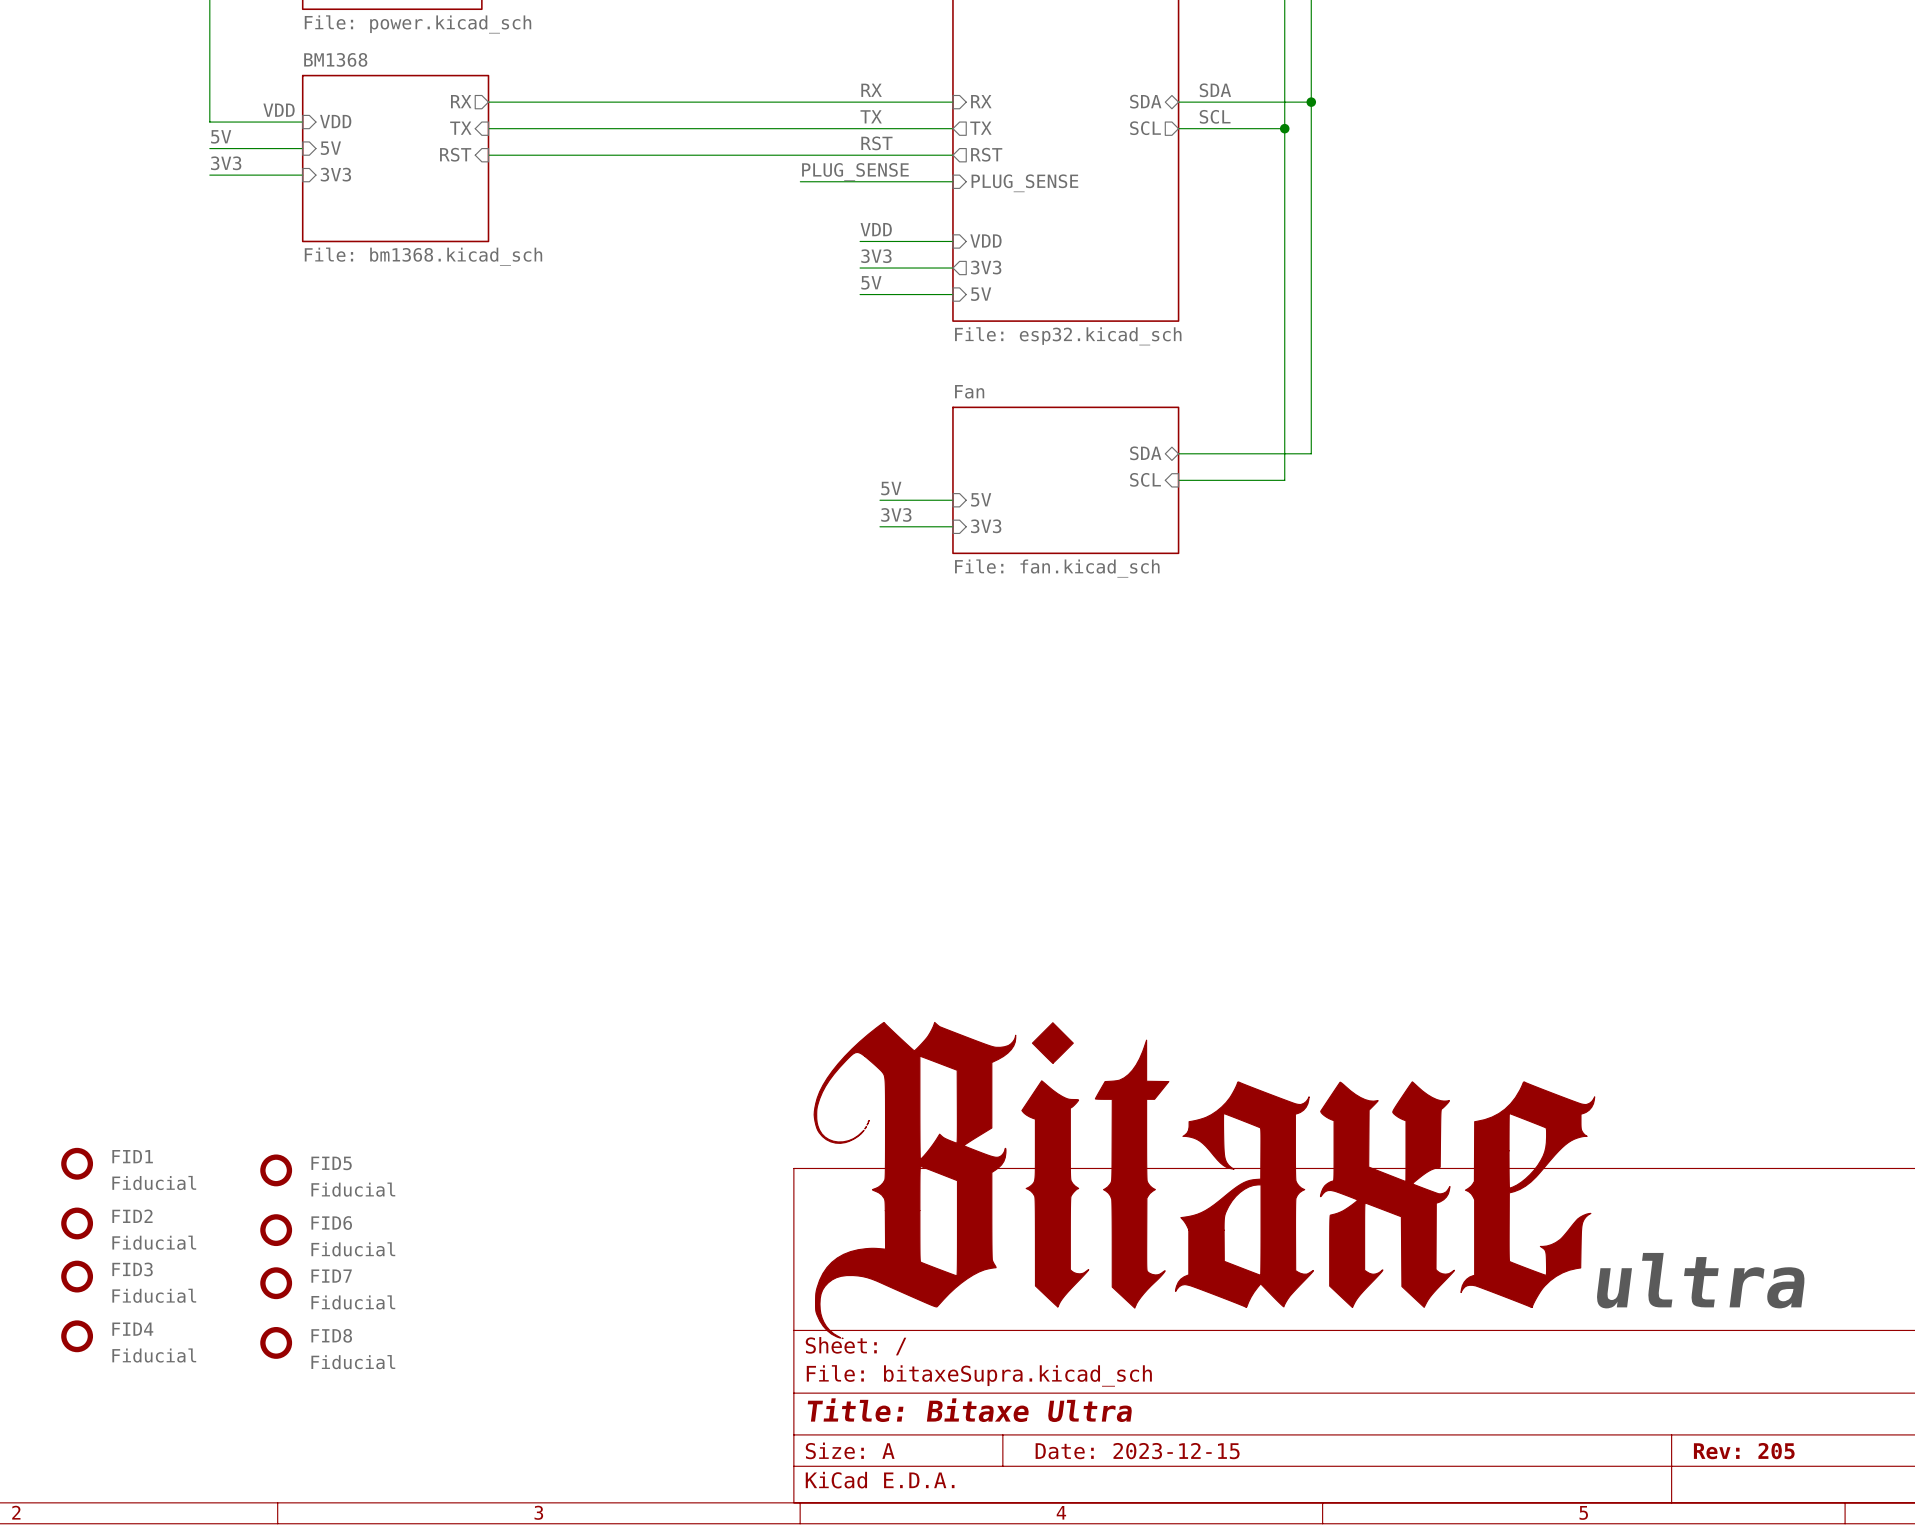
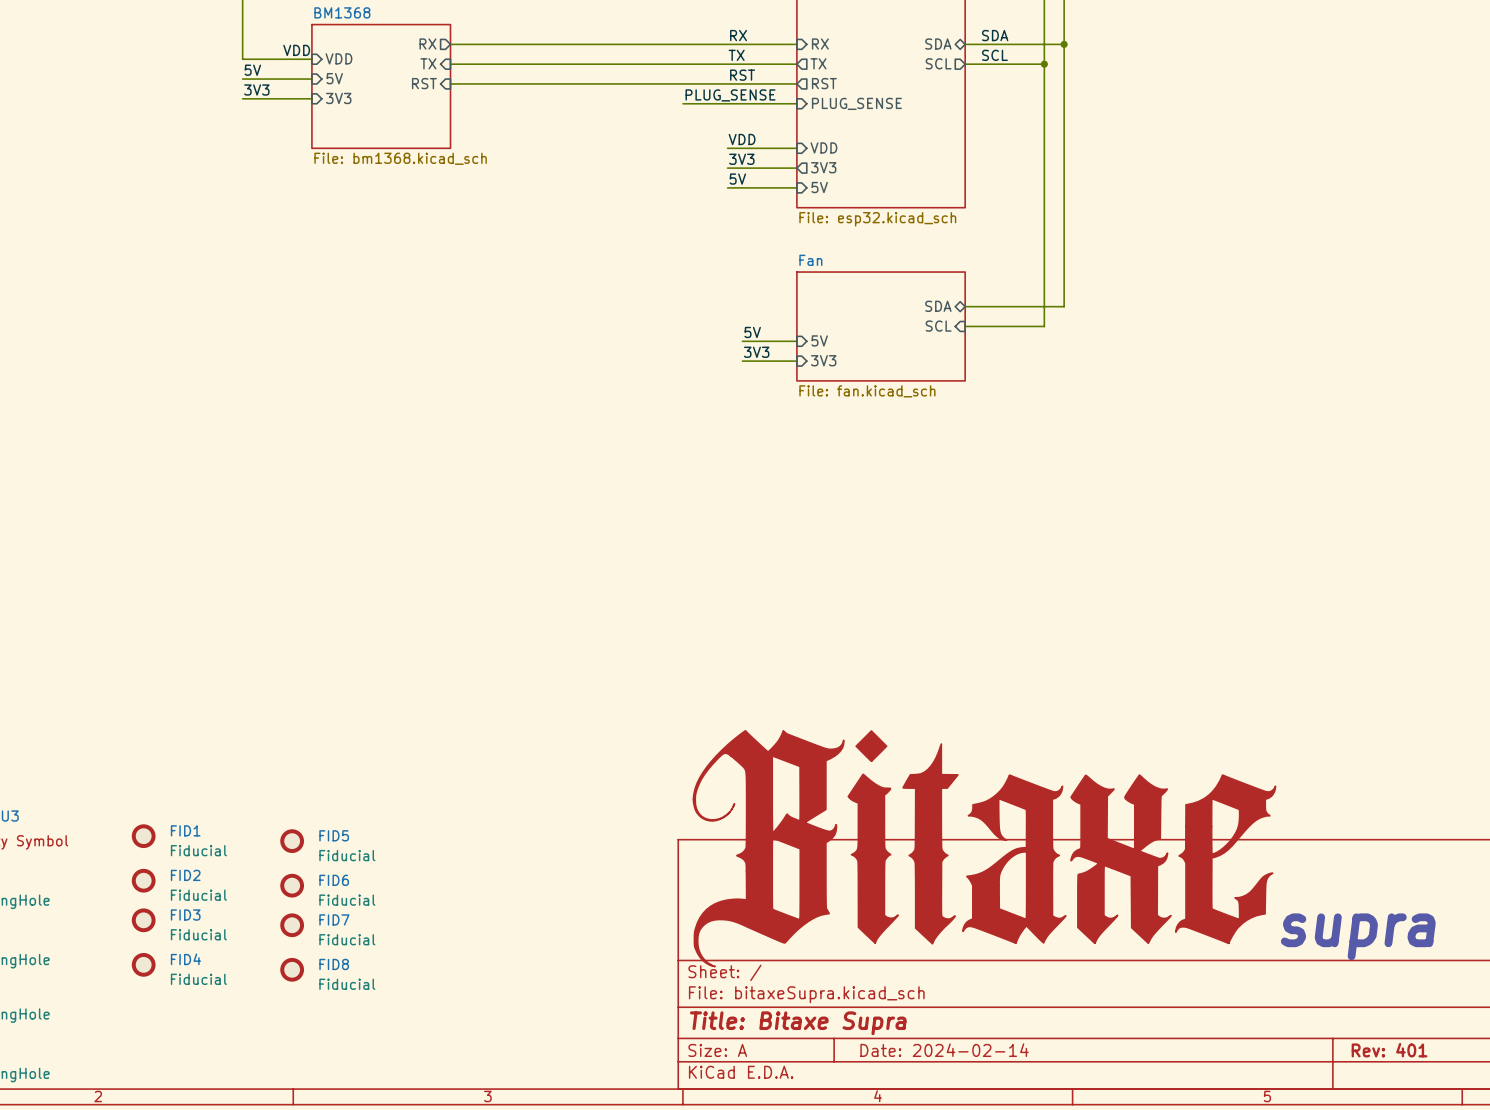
text: ultra (1700, 1280) -> supra (1358, 936)
title block: Title: Bitaxe Ultra (969, 1410) -> Title: Bitaxe Supra (798, 1023)
title block: Date: 2023-12-15 (1137, 1451) -> Date: 2024-02-14 (944, 1050)
title block: Rev: 205 (1744, 1451) -> Rev: 401 (1389, 1050)

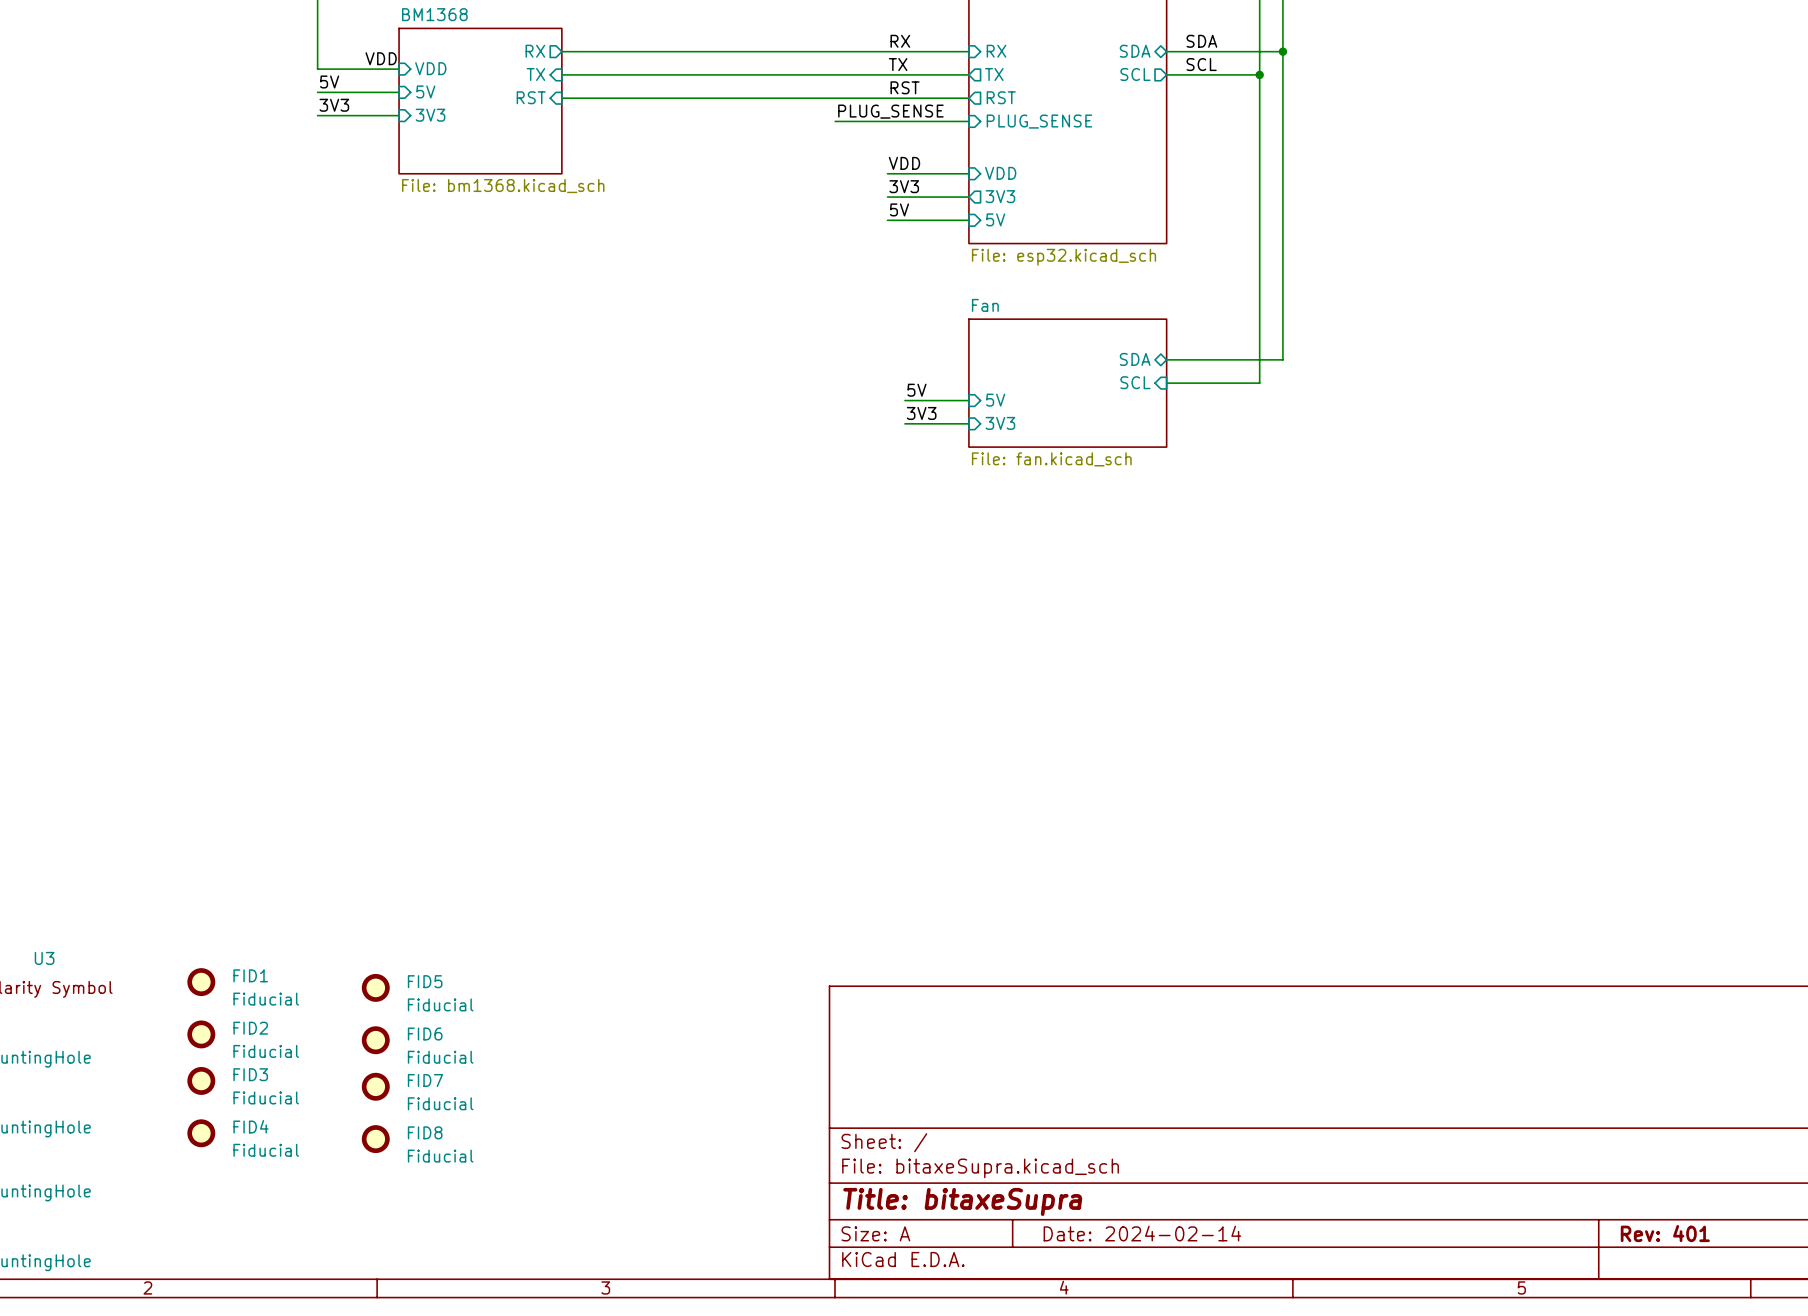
power symbol: (984, 848) -> none
text: supra (1358, 936) -> none
title block: Title: Bitaxe Supra (798, 1023) -> Title: bitaxeSupra (962, 1201)

